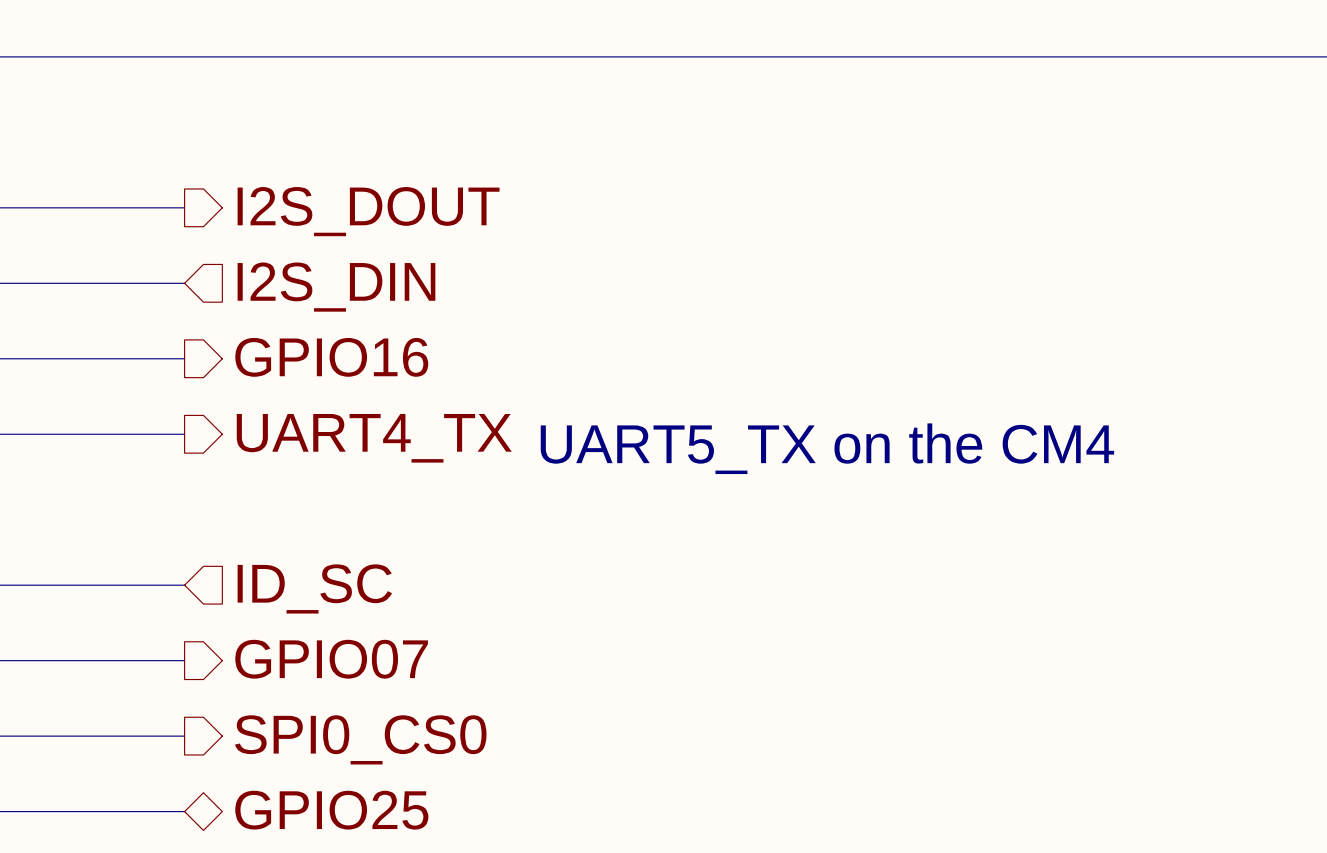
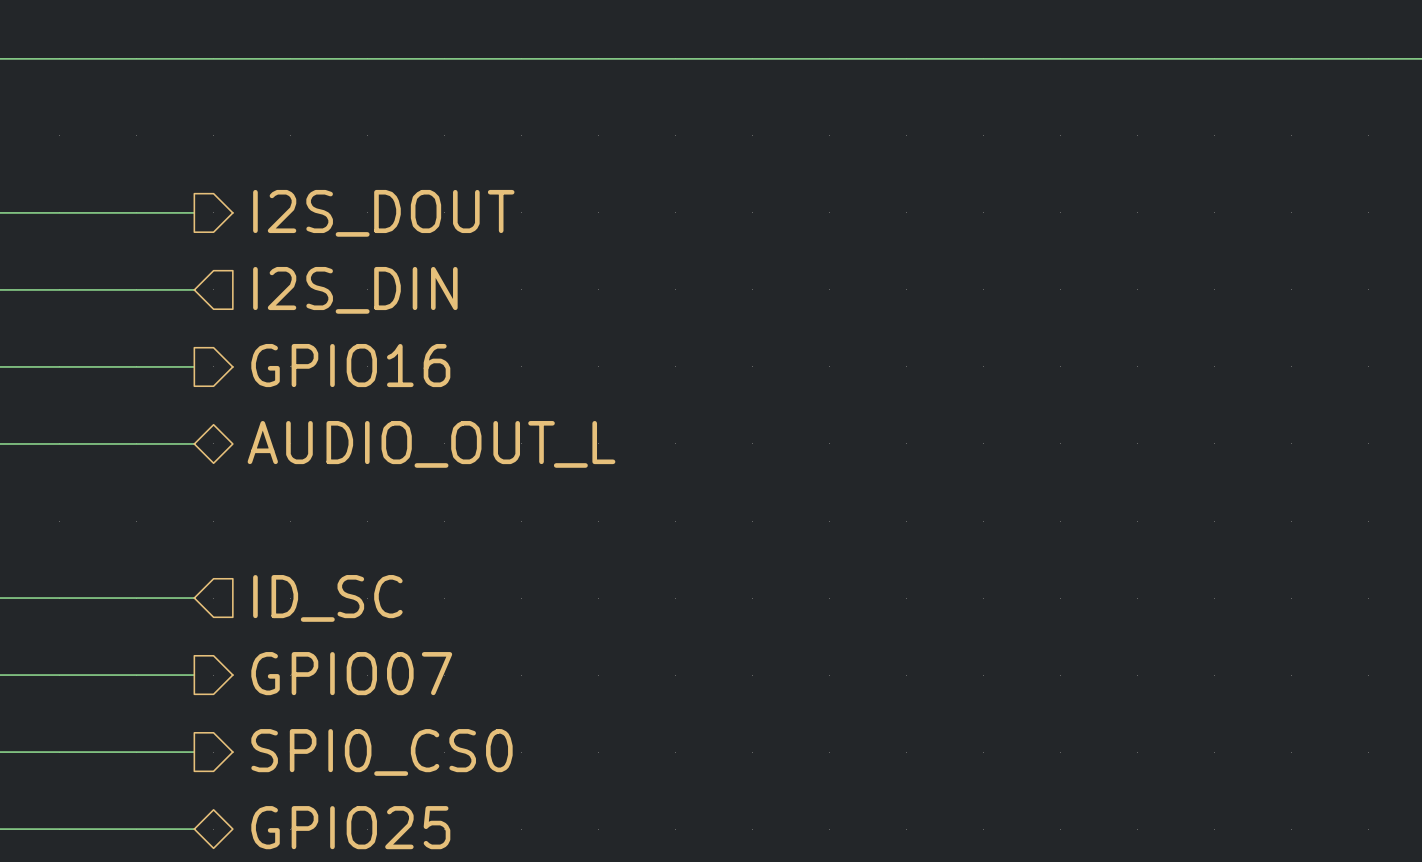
hierarchical label shape: output (374, 438) -> bidirectional (431, 444)
hierarchical label: UART4_TX (374, 438) -> AUDIO_OUT_L (431, 444)
text: UART5_TX on the CM4 (827, 448) -> none

